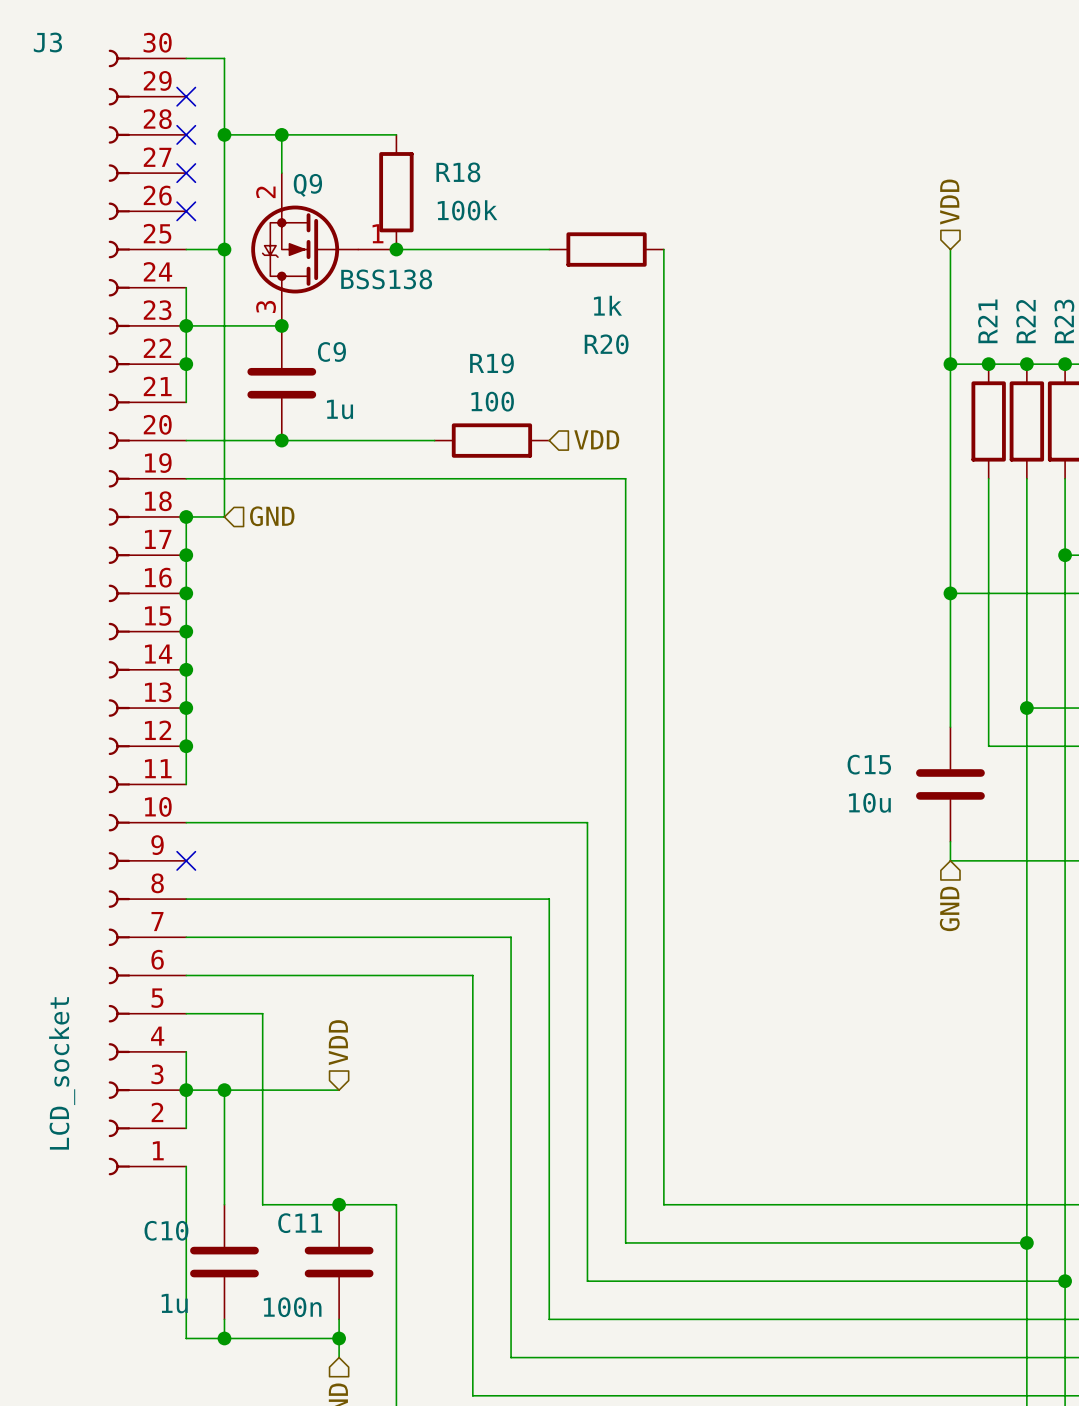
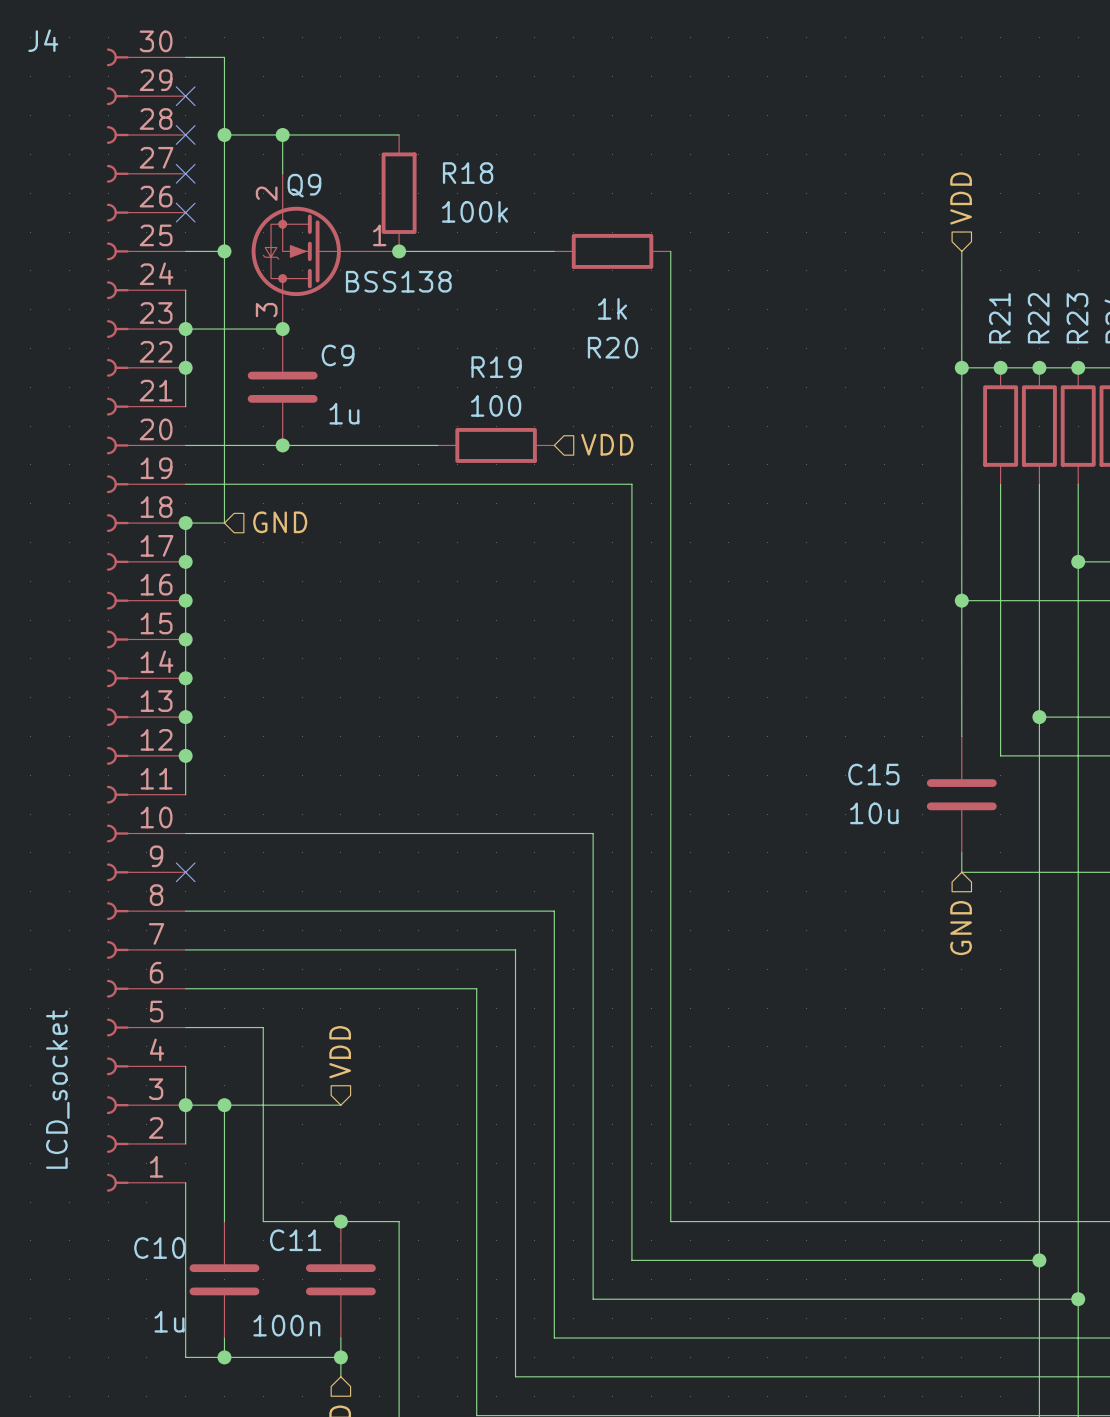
J3 name: J3 (47, 42) -> J4 (43, 40)

